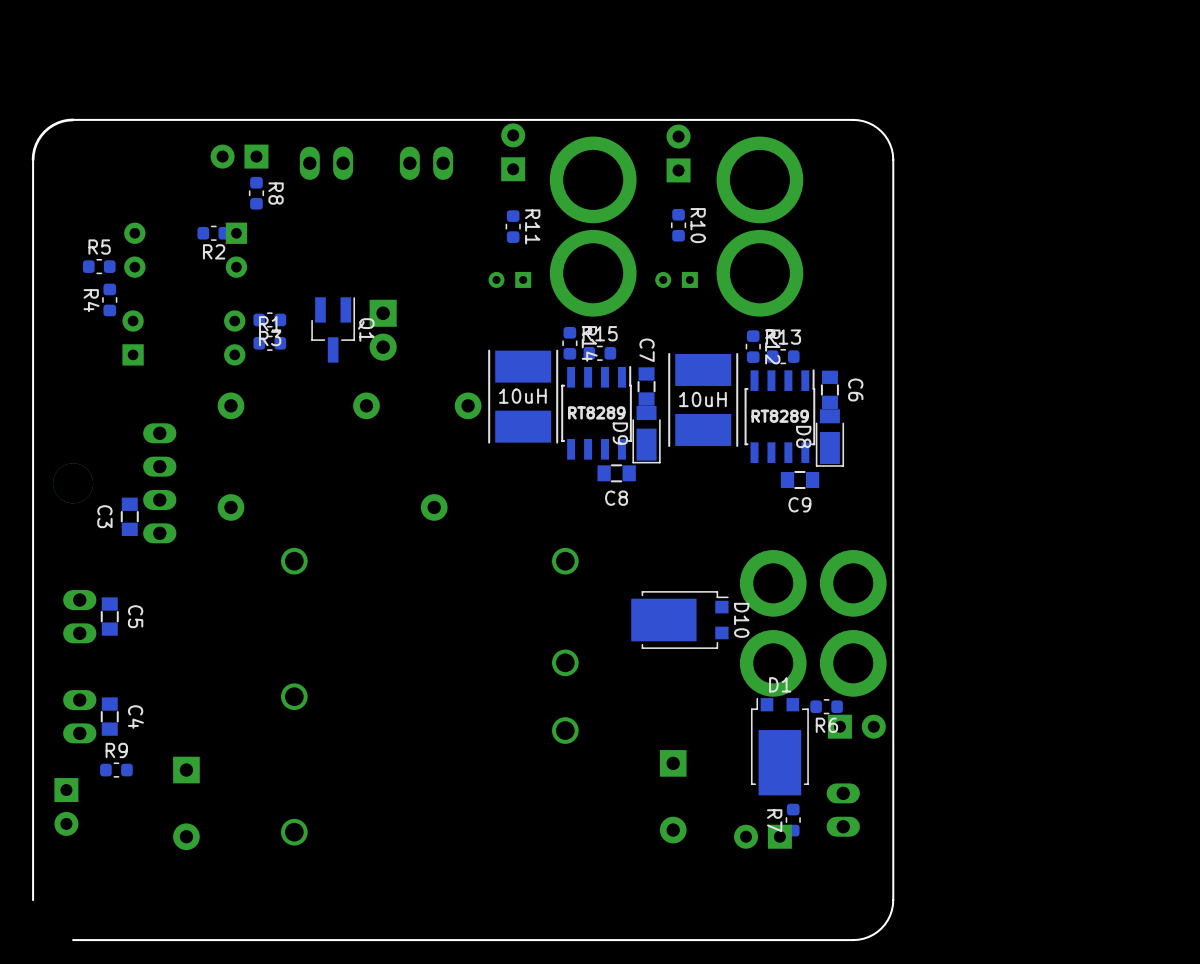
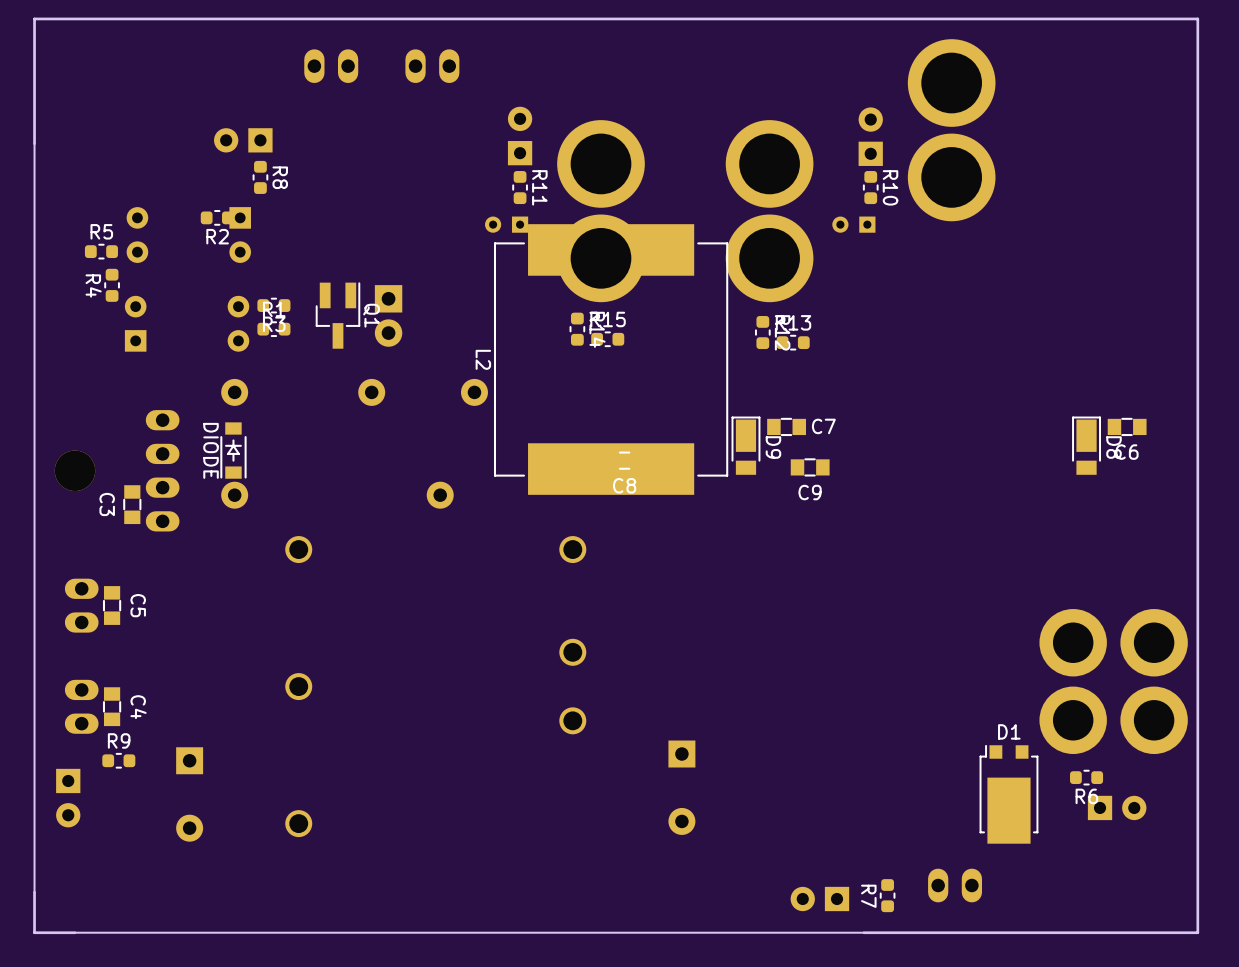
part: none -> (331, 66)
part: none -> (432, 66)
part: none -> (951, 130)
part position: (678, 153) -> (870, 136)
board edge: (33, 159) (36, 144) (44, 131) (57, 122) (73, 119) (853, 119) (868, 122) (881, 131) (890, 144) (893, 159) (893, 900) (890, 915) (881, 928) (868, 937) (853, 940) -> (34, 143) (34, 18) (1197, 18) (1197, 932) (863, 932)
part: (326, 163) -> none
part: (426, 163) -> none
R10 position: (678, 225) -> (870, 187)
R11 position: (513, 226) -> (520, 187)
part: none -> (853, 224)
part position: (509, 279) -> (506, 224)
part: (676, 279) -> none
L2: none -> (611, 359)
C7 rotation: 0° (646, 386) -> 90° clockwise (786, 426)
C7 position: (646, 386) -> (786, 426)
C6 rotation: 0° (829, 389) -> 90° clockwise (1127, 426)
C6 position: (829, 389) -> (1127, 426)
part: 10uH (523, 396) -> none
part: 10uH (703, 399) -> none
part: RT8289 (596, 412) -> none
part: RT8289 (779, 416) -> none
D9 rotation: 0° (646, 434) -> 180° (745, 445)
D9 position: (646, 434) -> (745, 445)
D8 rotation: 0° (829, 438) -> 180° (1086, 445)
D8 position: (829, 438) -> (1086, 445)
part: none -> DIODE (233, 450)
part: (813, 583) -> none
D10: (679, 620) -> none
part: none -> (1113, 642)
part: (813, 663) -> none
R6 position: (826, 706) -> (1086, 777)
part: (856, 726) -> none
part: none -> (1113, 720)
D1 position: (779, 746) -> (1008, 794)
part rotation: 0° (843, 810) -> 90° clockwise (955, 885)
part position: (843, 810) -> (955, 885)
part: none -> (1117, 807)
R7 position: (793, 820) -> (887, 895)
part position: (762, 836) -> (819, 899)
board edge: none -> (34, 892) (34, 932) (74, 932)

